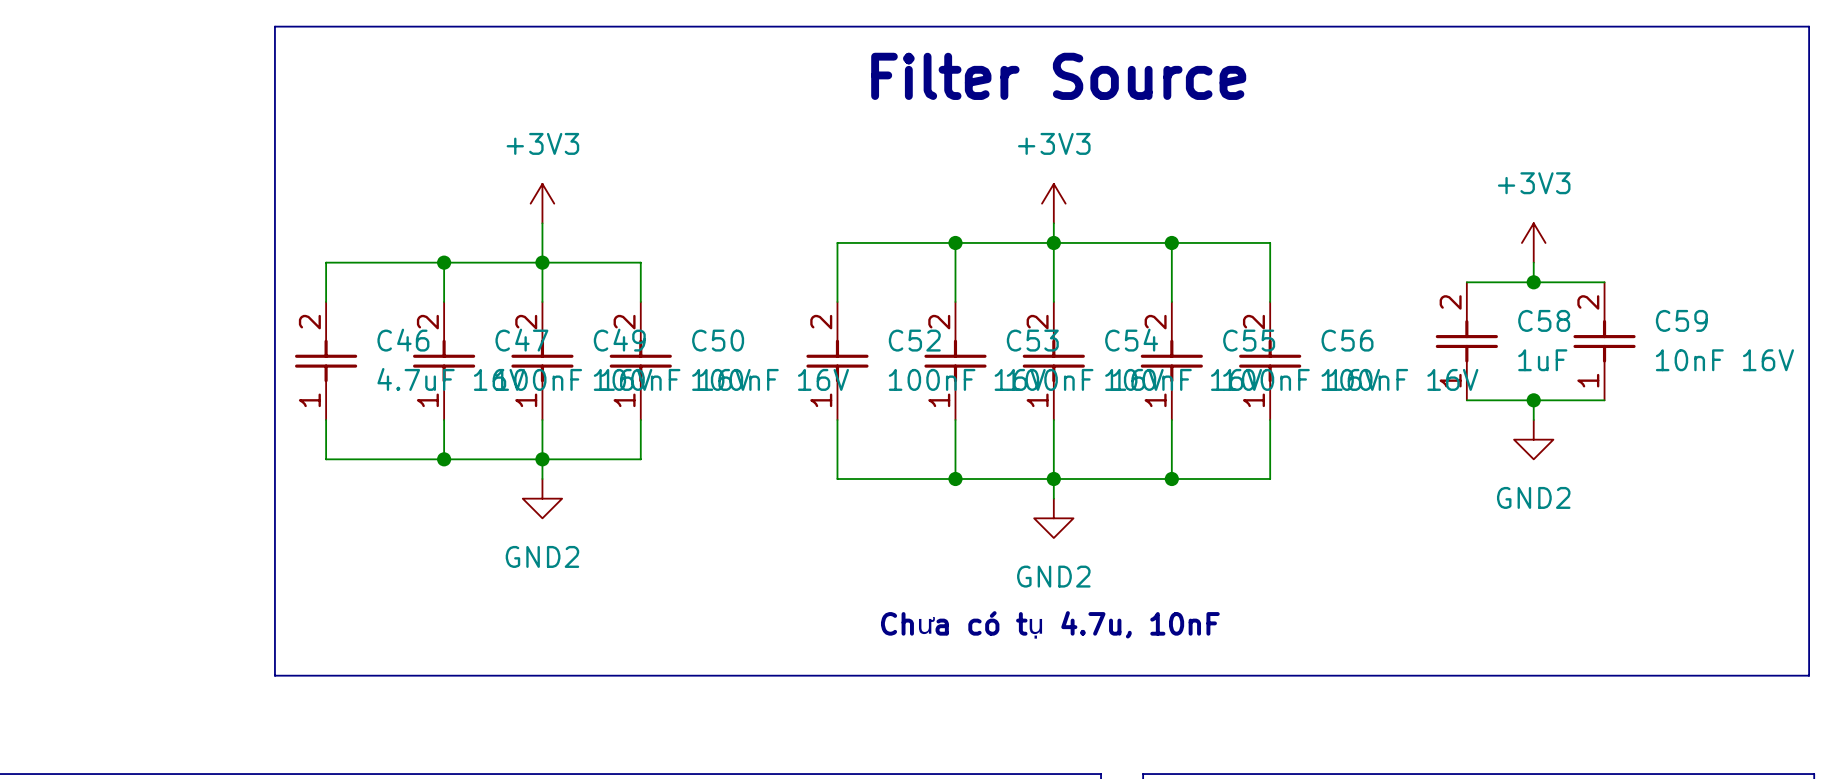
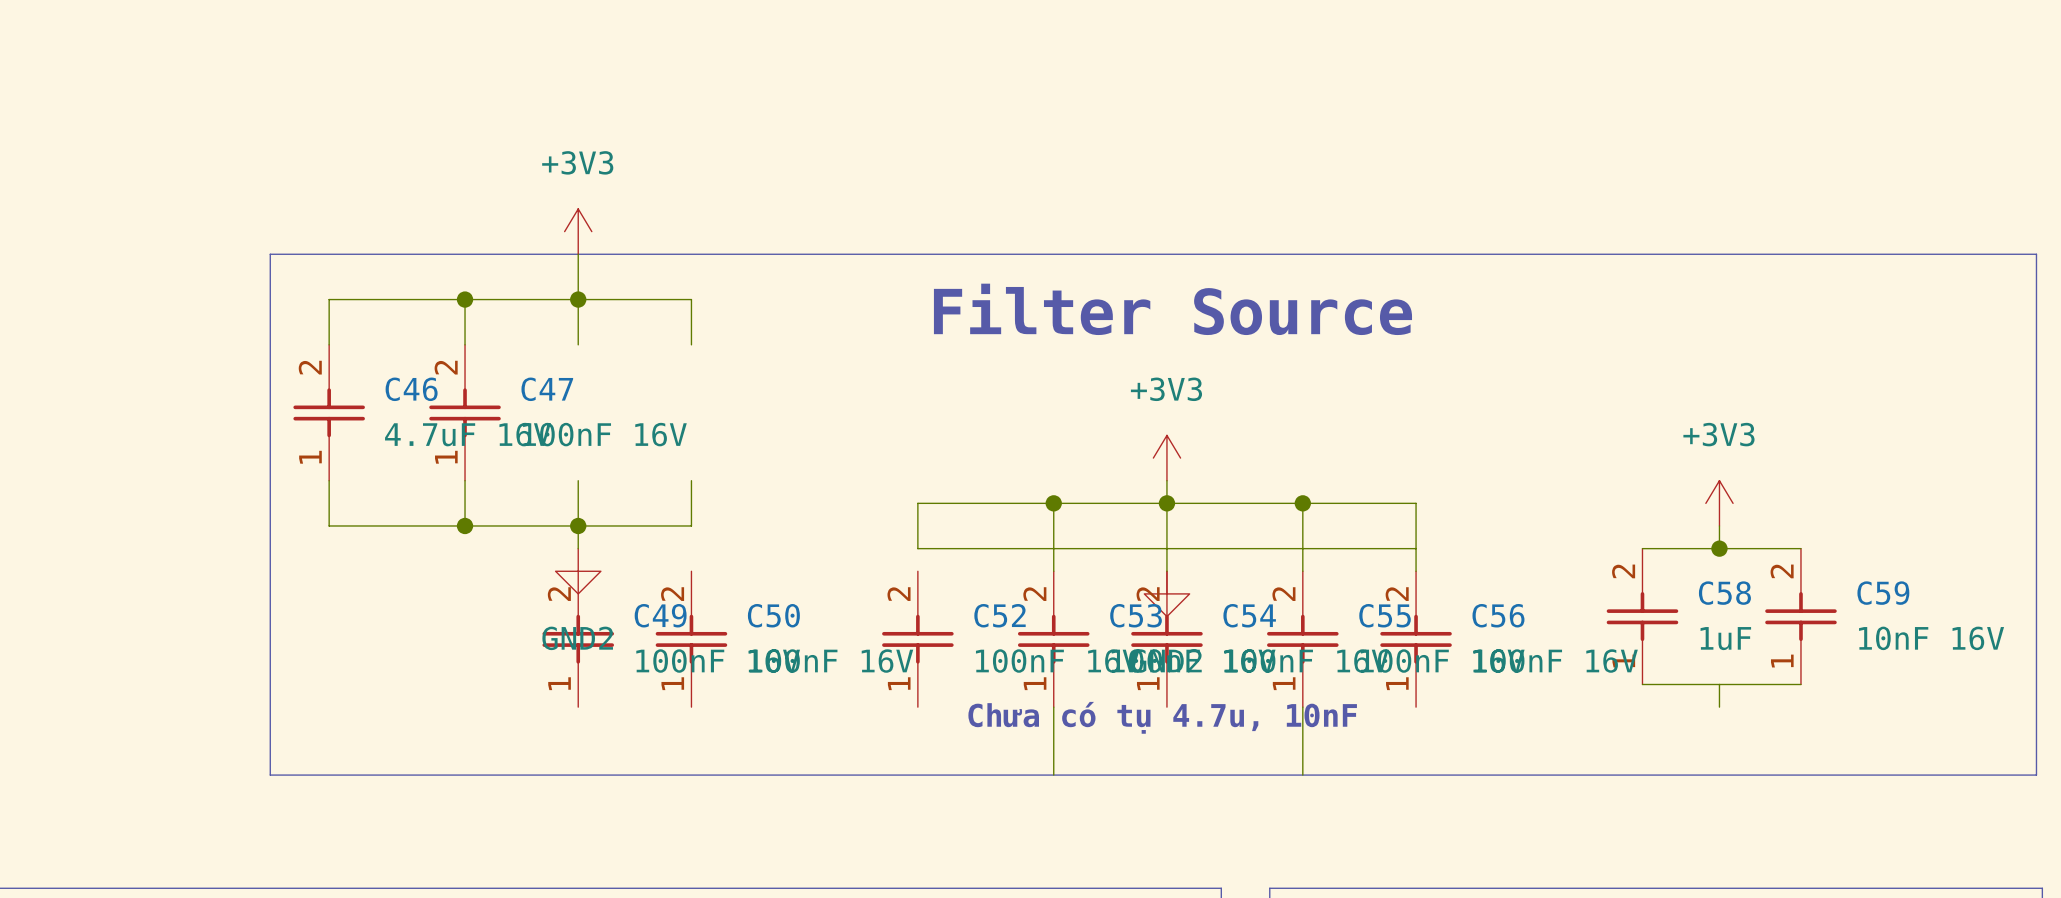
text position: Filter Source (1058, 76) -> Filter Source (1172, 309)
power symbol position: +3V3 (1053, 203) -> +3V3 (1166, 458)
line: (274, 223) (274, 26) (1809, 26) (1809, 223) -> (270, 254) (2036, 254)
wire: (1053, 223) (1053, 301) -> none
wire: (955, 242) (955, 301) -> (1053, 707) (1053, 775)
junction: (955, 242) -> none
junction: (1053, 242) -> none
wire: (1171, 242) (1171, 301) -> (1302, 707) (1302, 775)
junction: (1171, 242) -> none
power symbol: +3V3 (1533, 242) -> none
wire: (1533, 262) (1533, 282) -> (1719, 684) (1719, 707)
wire: (1466, 282) (1604, 282) -> (1642, 548) (1800, 548)
junction: (1533, 282) -> none
wire: (837, 301) (837, 242) (1270, 242) (1270, 301) -> none
C58 position: (1466, 341) -> (1642, 616)
C59 position: (1604, 341) -> (1800, 616)
C49 position: (542, 360) -> (578, 639)
C50 position: (640, 360) -> (691, 639)
C52 position: (837, 360) -> (917, 639)
C53 position: (955, 360) -> (1053, 639)
C54 position: (1053, 360) -> (1166, 639)
C55 position: (1171, 360) -> (1302, 639)
C56 position: (1270, 360) -> (1416, 639)
wire: (1466, 400) (1604, 400) -> (1642, 684) (1800, 684)
wire: (1533, 400) (1533, 419) -> (1719, 525) (1719, 548)
junction position: (1533, 400) -> (1719, 548)
wire: (837, 419) (837, 439) -> (1416, 503) (917, 503)
wire: (955, 419) (955, 439) -> (1053, 548) (1053, 571)
wire: (1171, 419) (1171, 439) -> (1302, 548) (1302, 571)
wire: (1270, 419) (1270, 439) -> (1416, 548) (1416, 571)
power symbol: GND2 (1533, 439) -> +3V3 (1719, 503)
junction position: (955, 479) -> (1053, 503)
junction position: (1053, 479) -> (1166, 503)
junction position: (1171, 479) -> (1302, 503)

